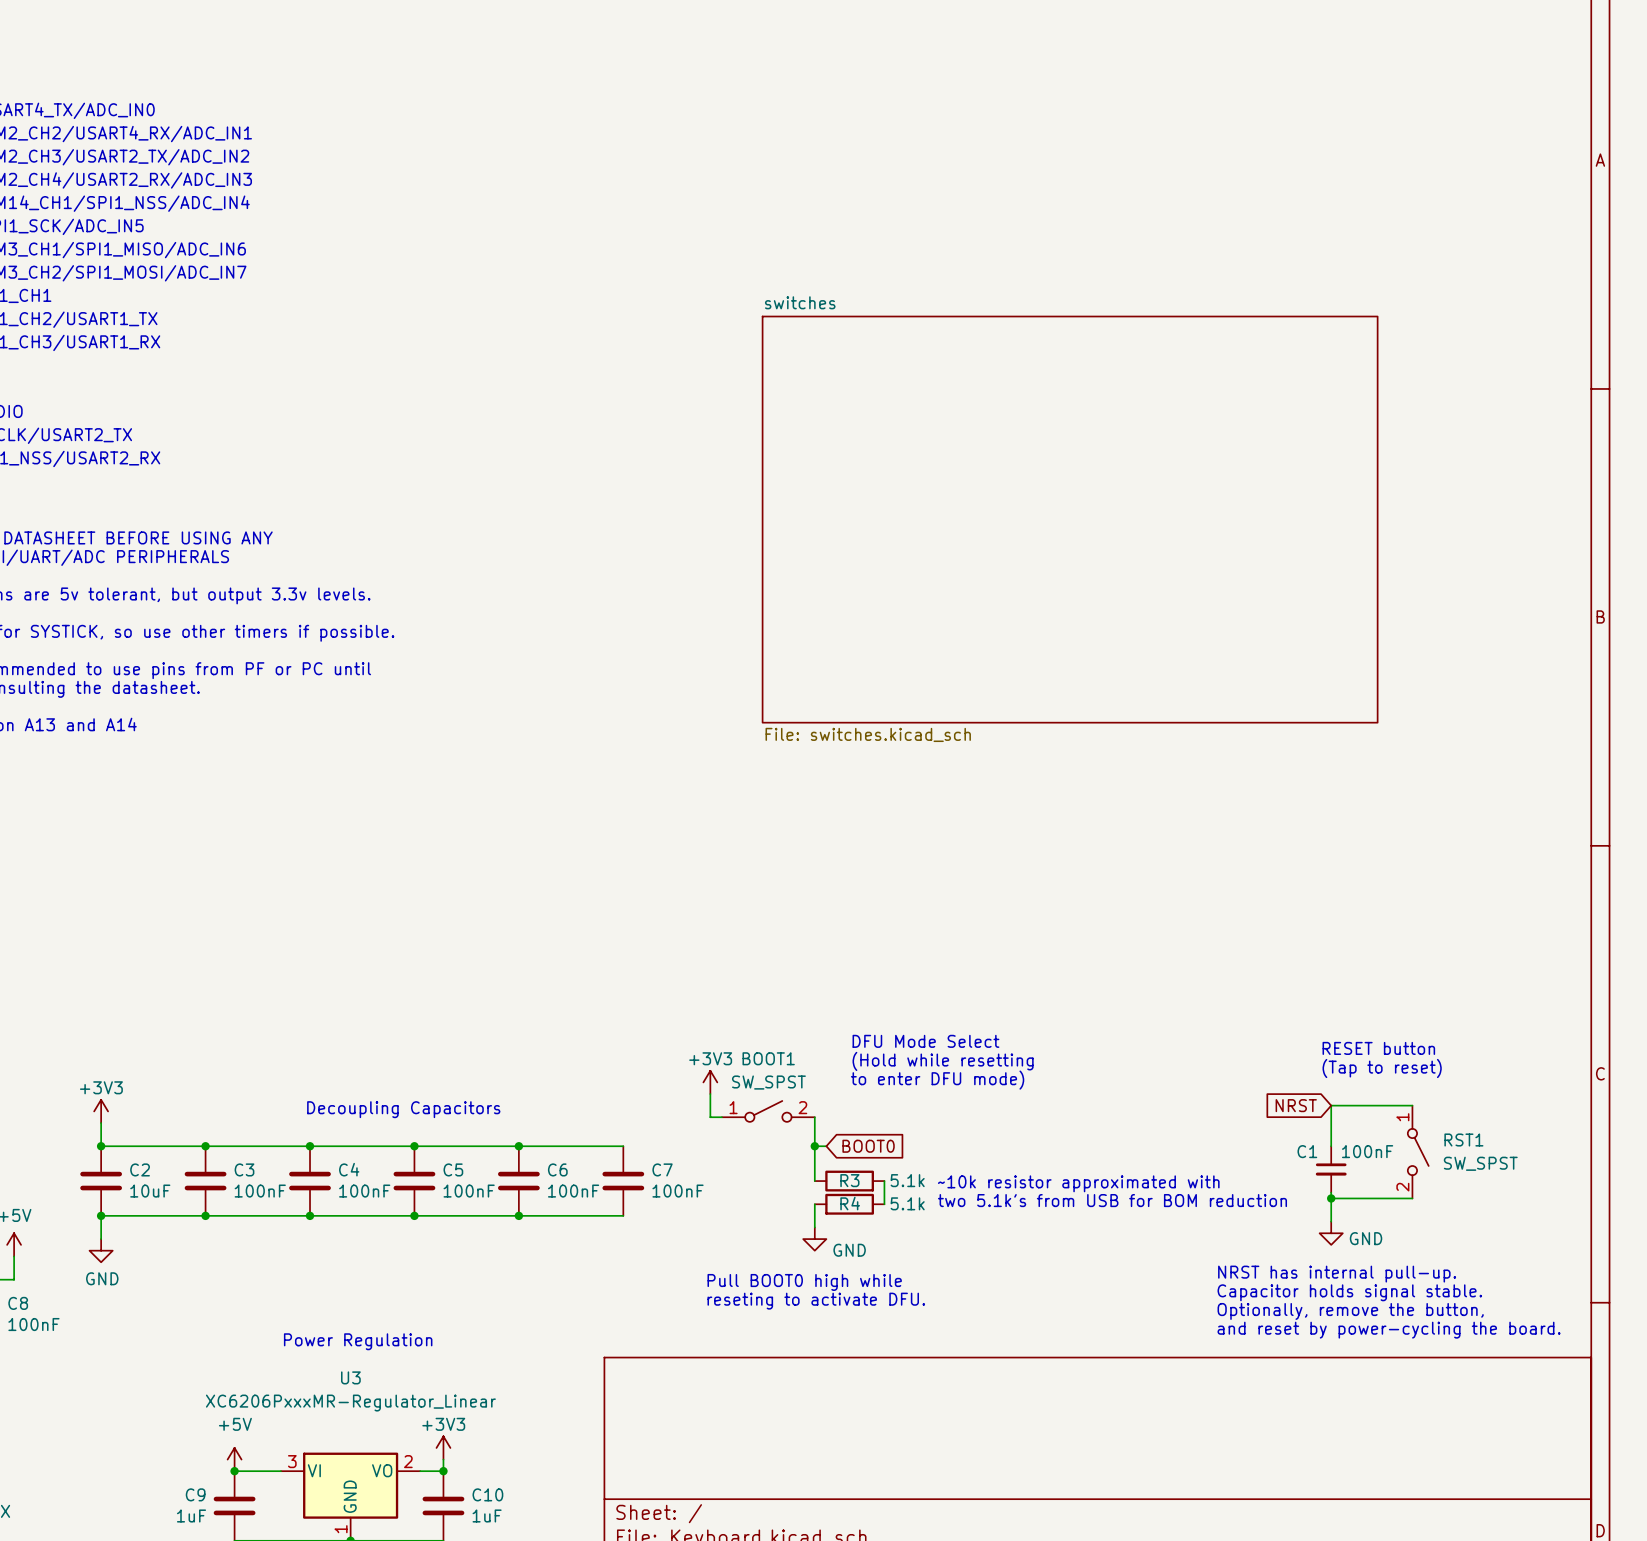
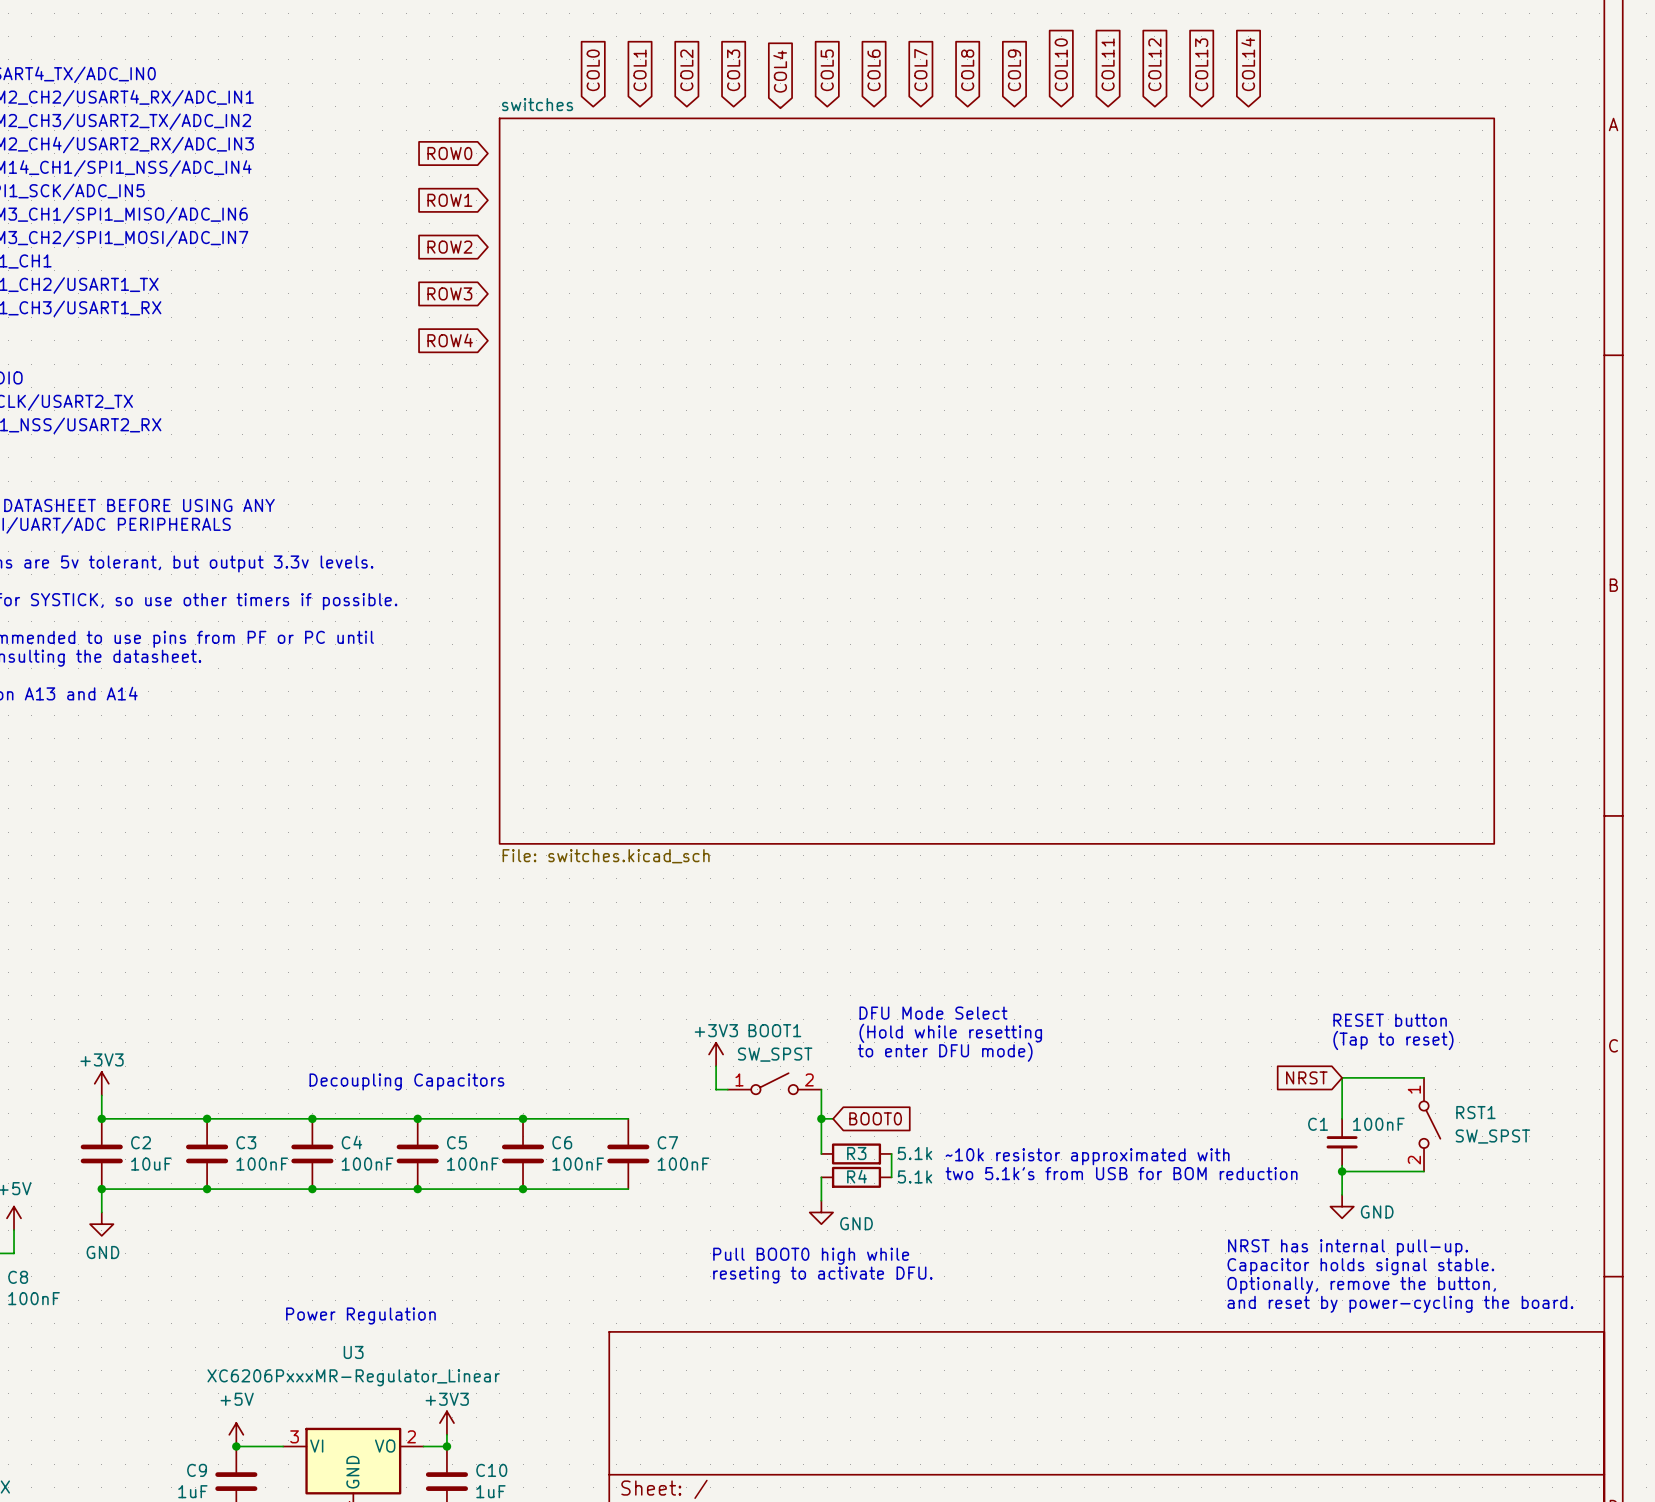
global label: none -> COL10 (1061, 64)
global label: none -> COL11 (1108, 64)
global label: none -> COL12 (1154, 64)
global label: none -> COL13 (1201, 64)
global label: none -> COL14 (1248, 64)
global label: none -> COL0 (593, 70)
global label: none -> COL1 (640, 70)
global label: none -> COL2 (686, 70)
global label: none -> COL3 (733, 70)
global label: none -> COL5 (827, 70)
global label: none -> COL6 (874, 70)
global label: none -> COL7 (920, 70)
global label: none -> COL8 (967, 70)
global label: none -> COL9 (1014, 70)
global label: none -> COL4 (780, 71)
global label: none -> ROW0 (449, 153)
global label: none -> ROW1 (449, 200)
global label: none -> ROW2 (449, 247)
global label: none -> ROW3 (449, 293)
global label: none -> ROW4 (450, 340)
sheet switches: none -> File: switches.kicad_sch (996, 481)
sheet switches: File: switches.kicad_sch (1070, 519) -> none

